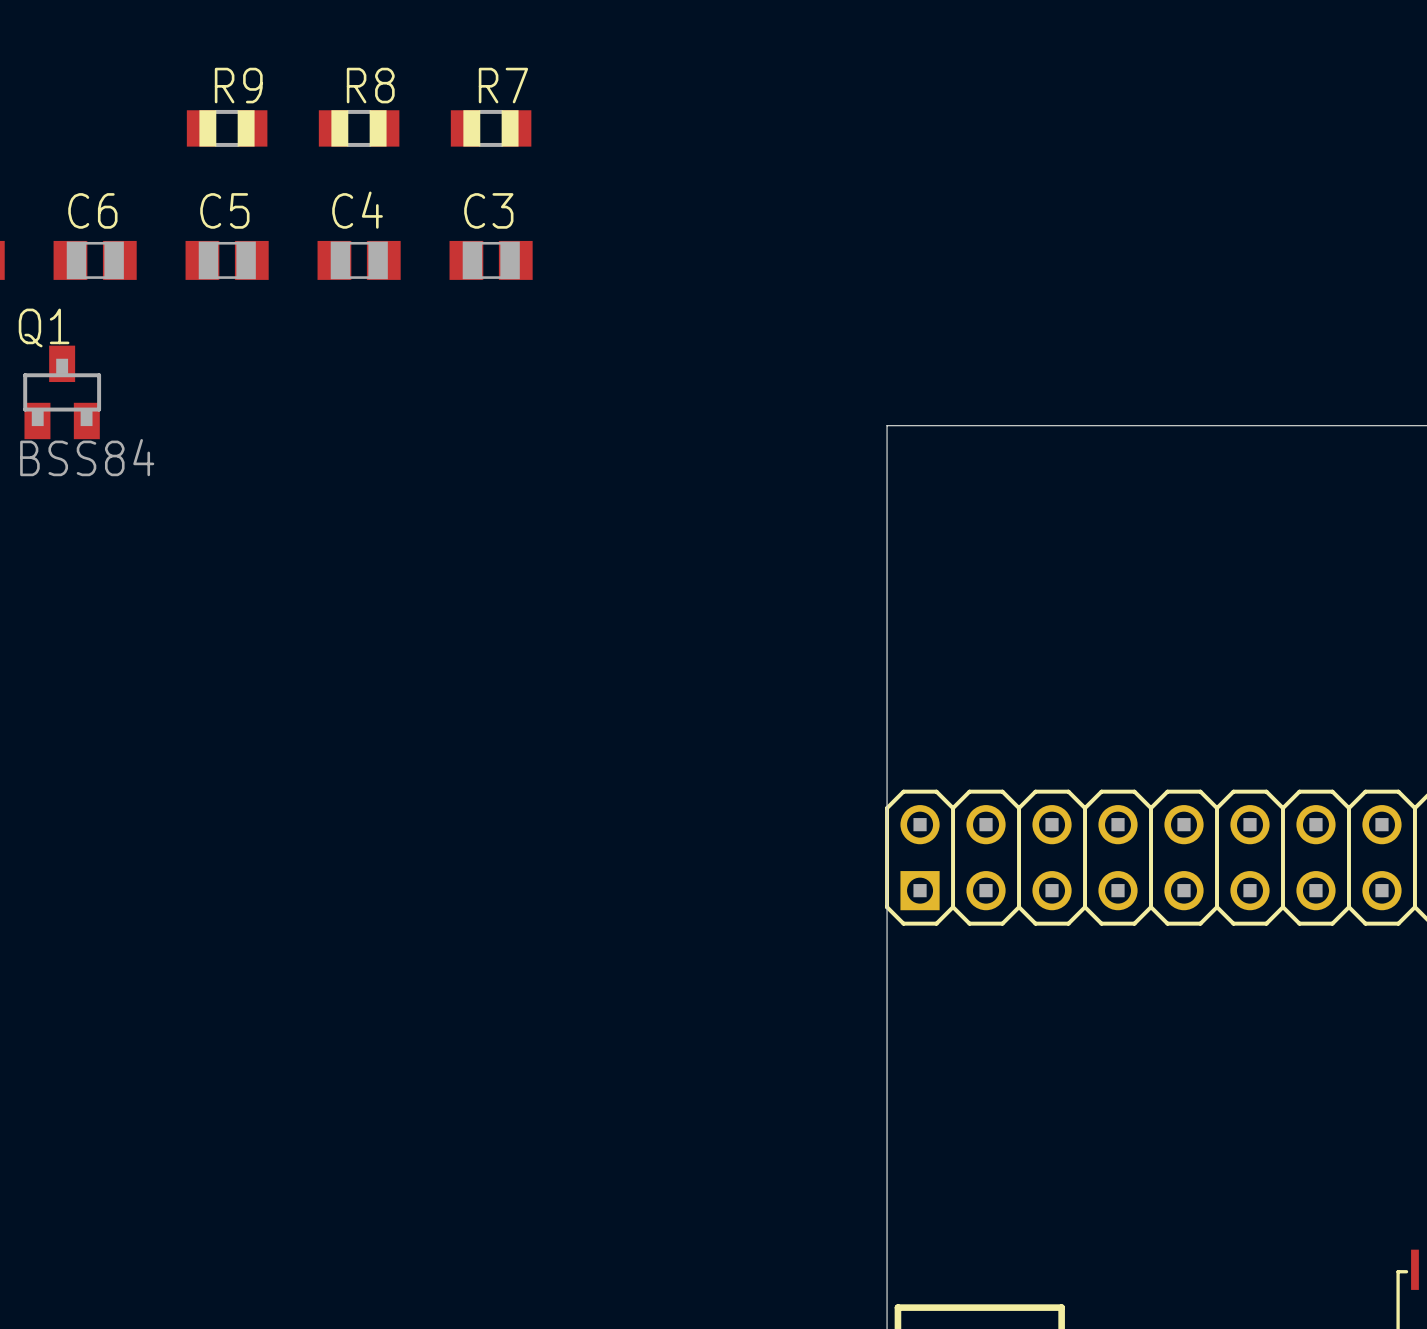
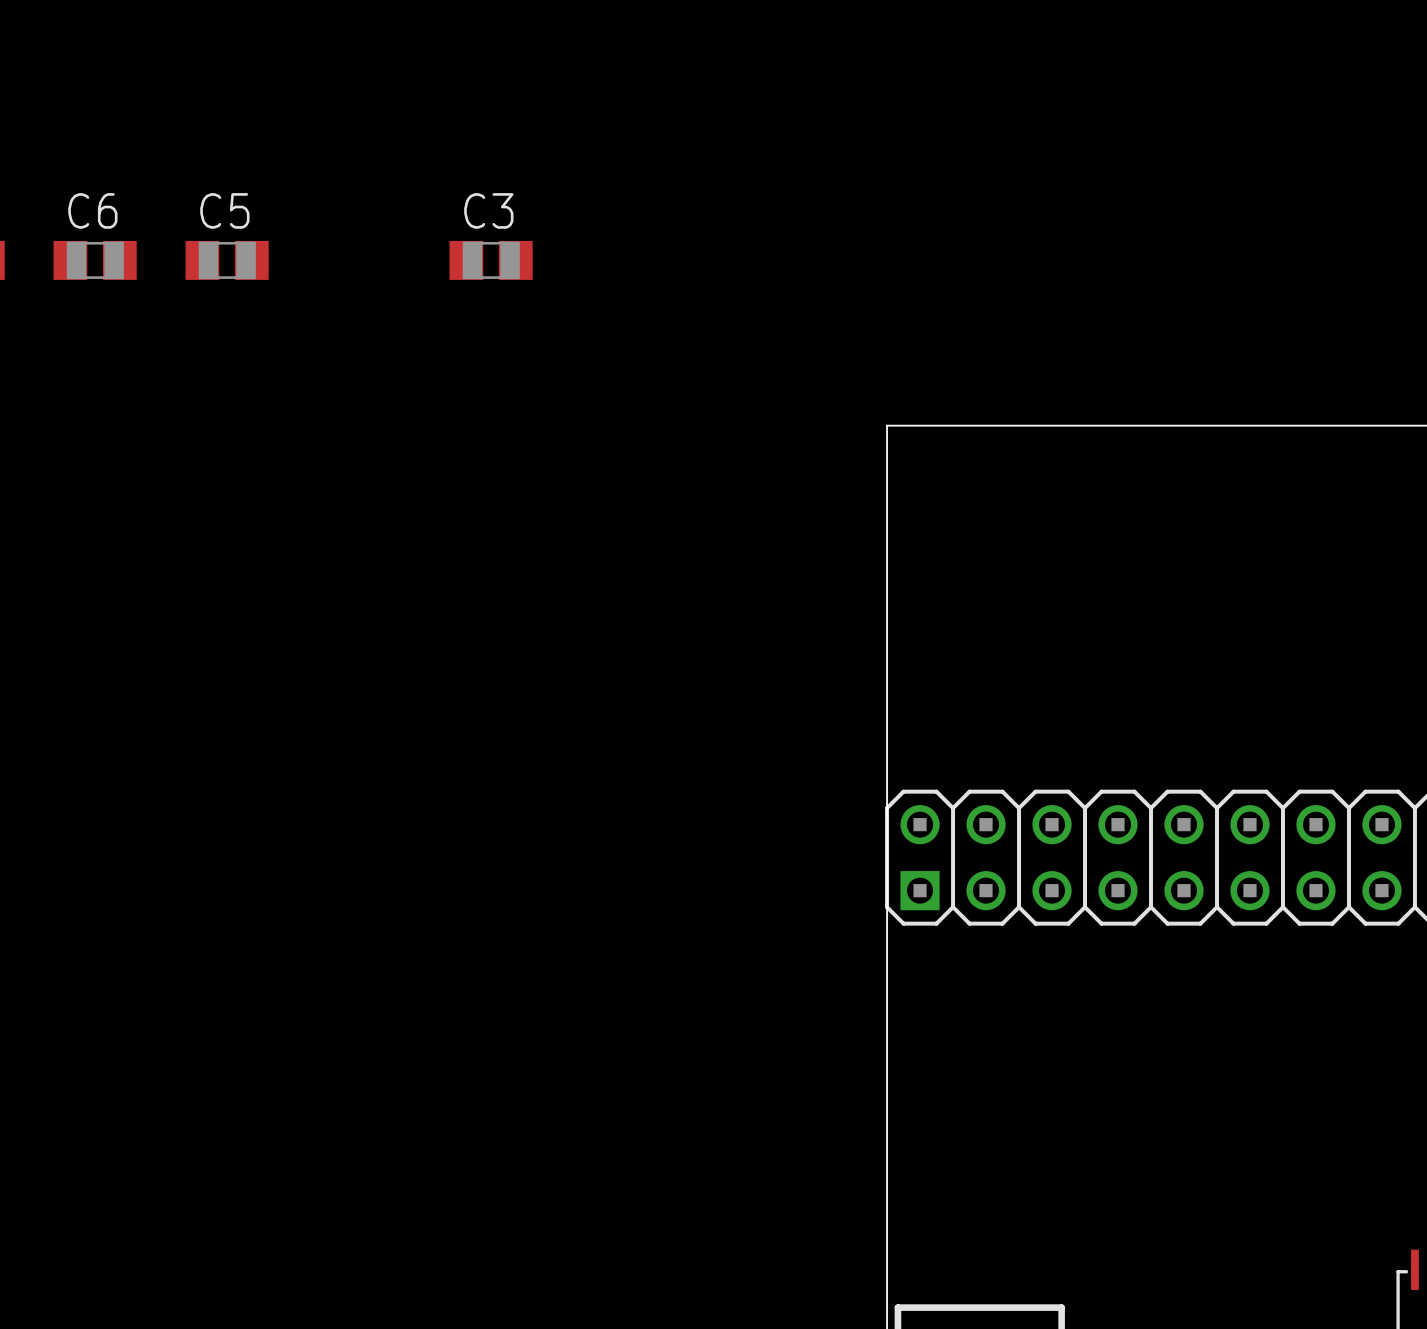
R9: (227, 128) -> none
R8: (359, 128) -> none
R7: (491, 128) -> none
C4: (359, 260) -> none
Q1: BSS84 (62, 392) -> none

